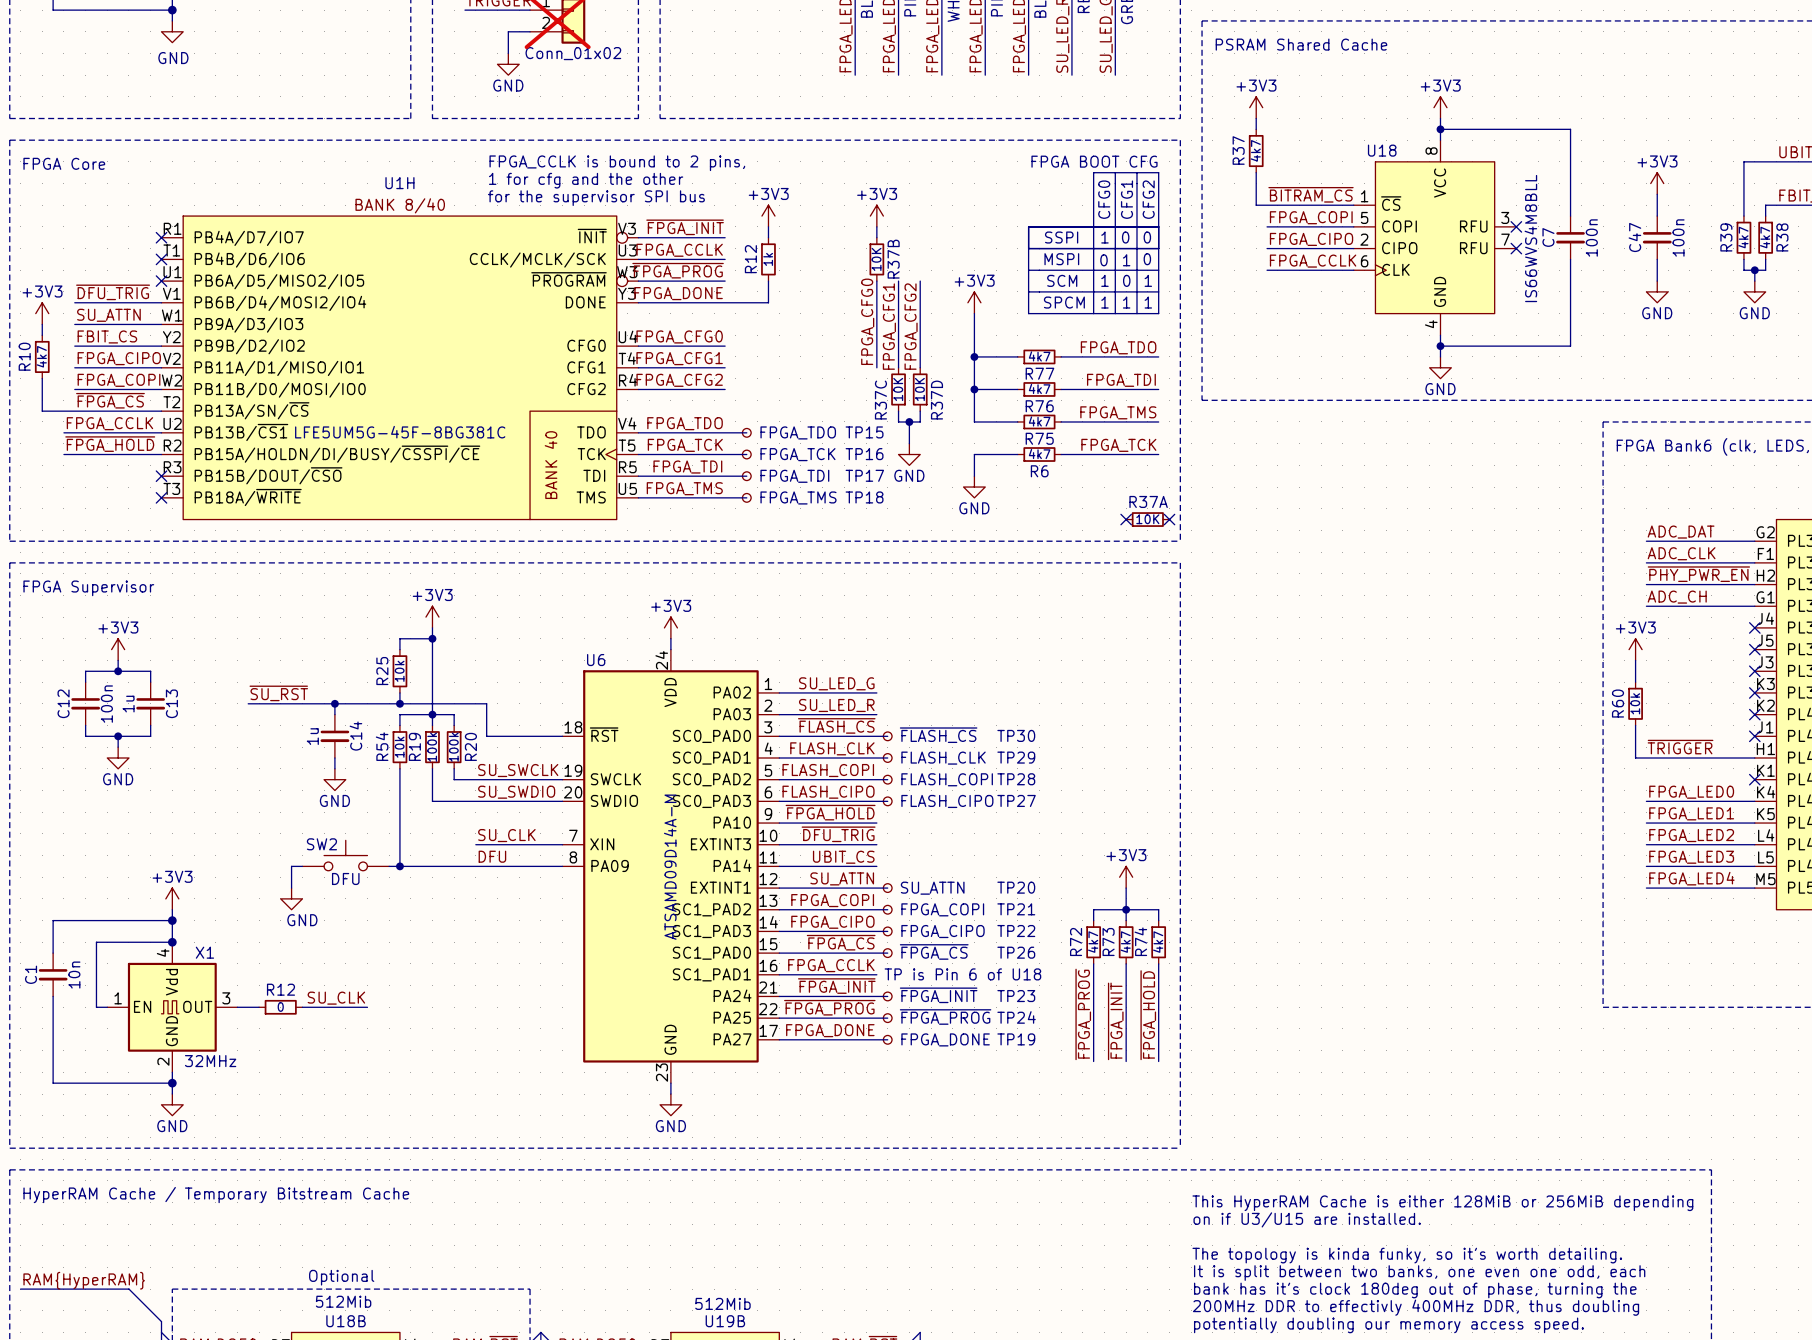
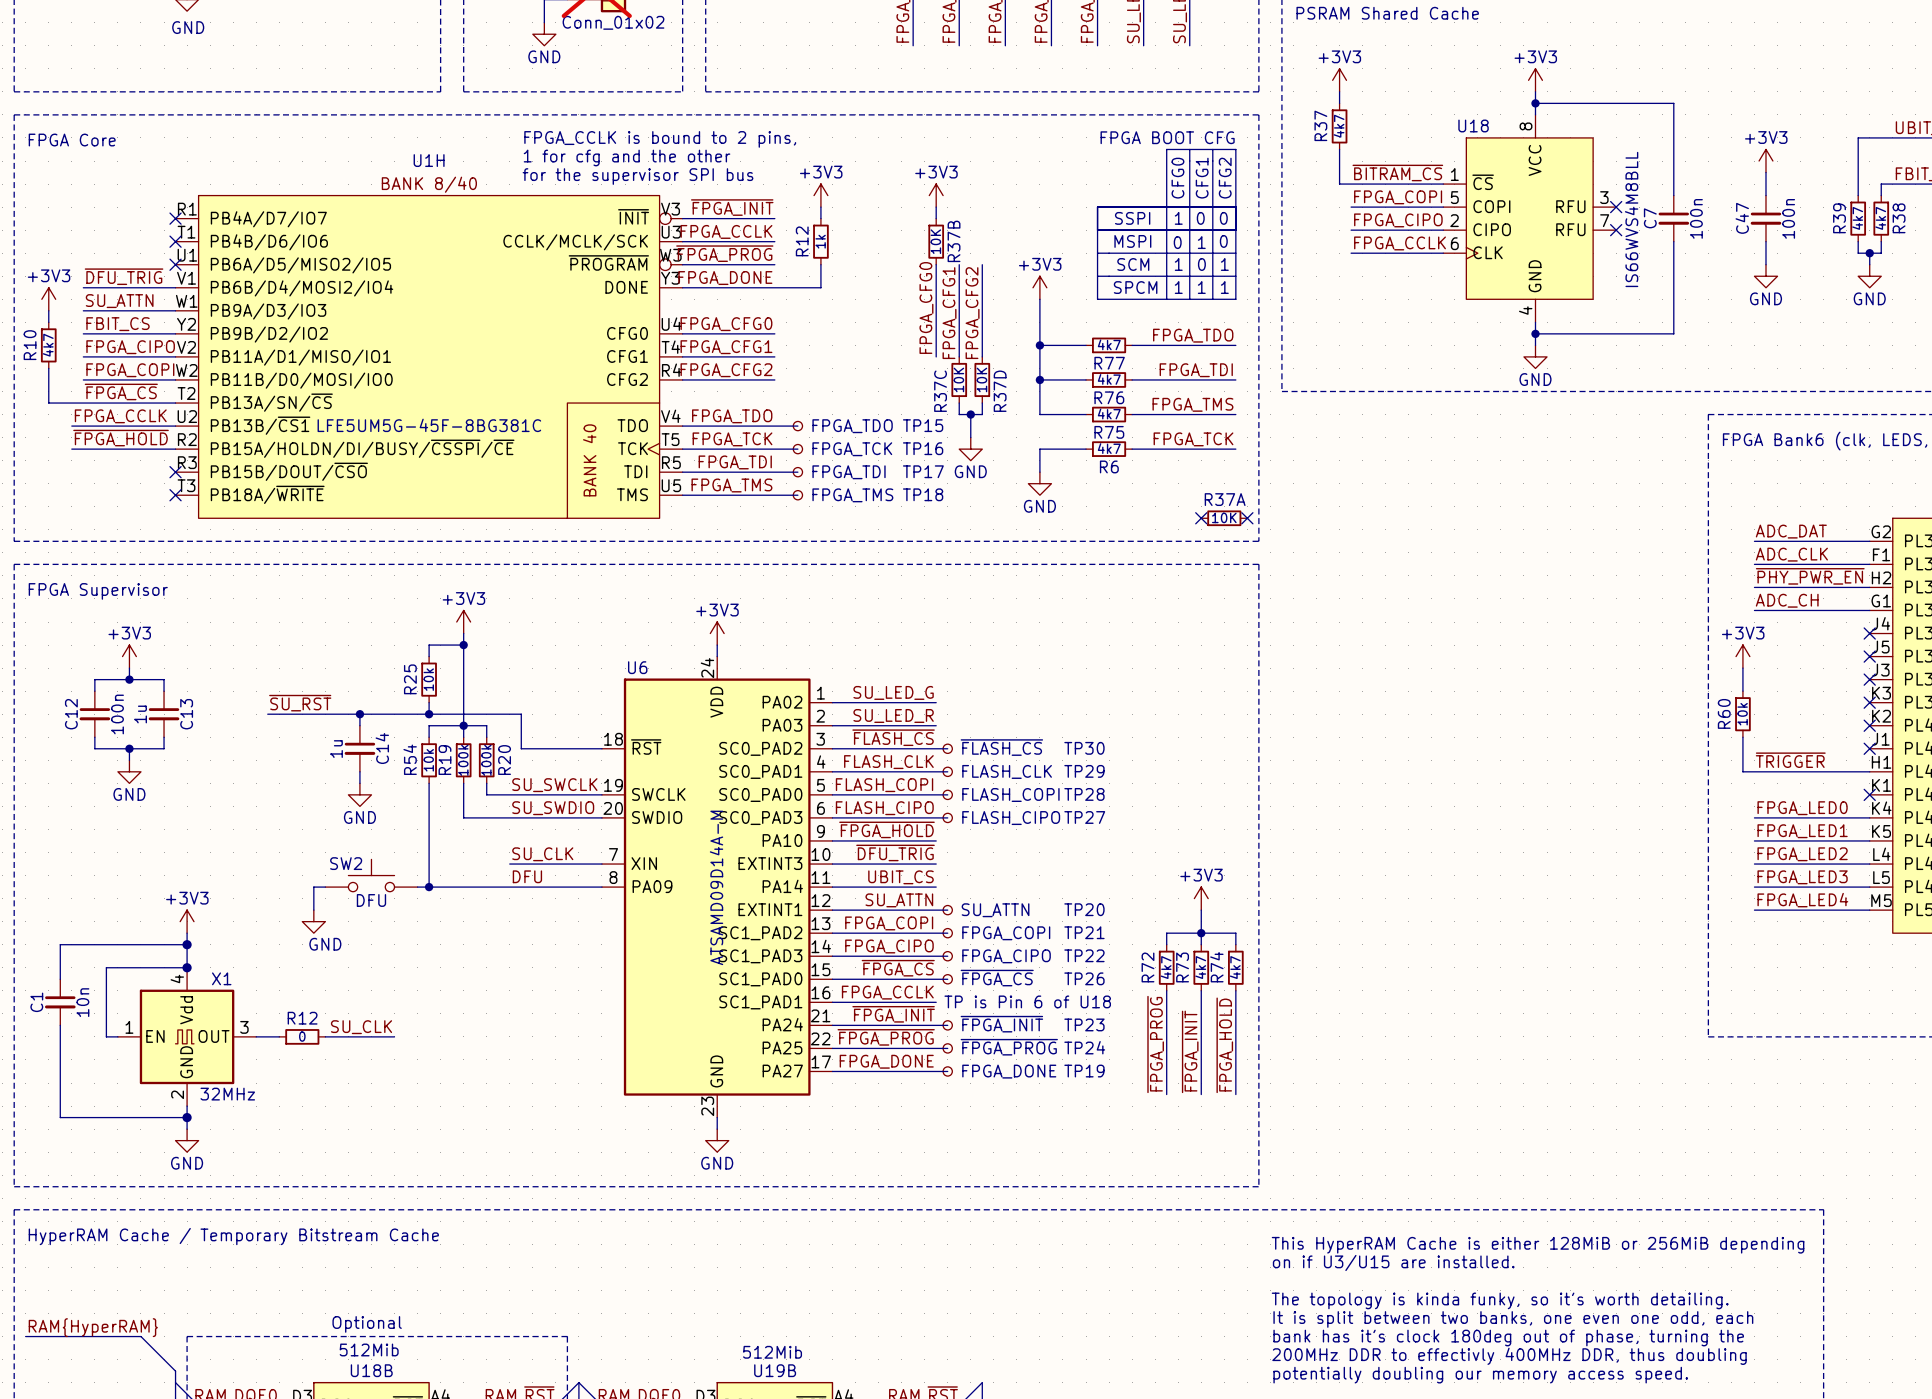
U6 pin name: SC0_PAD0 (711, 736) -> SC0_PAD2 (760, 748)
U6 pin name: SC0_PAD2 (711, 779) -> SC0_PAD0 (760, 794)

